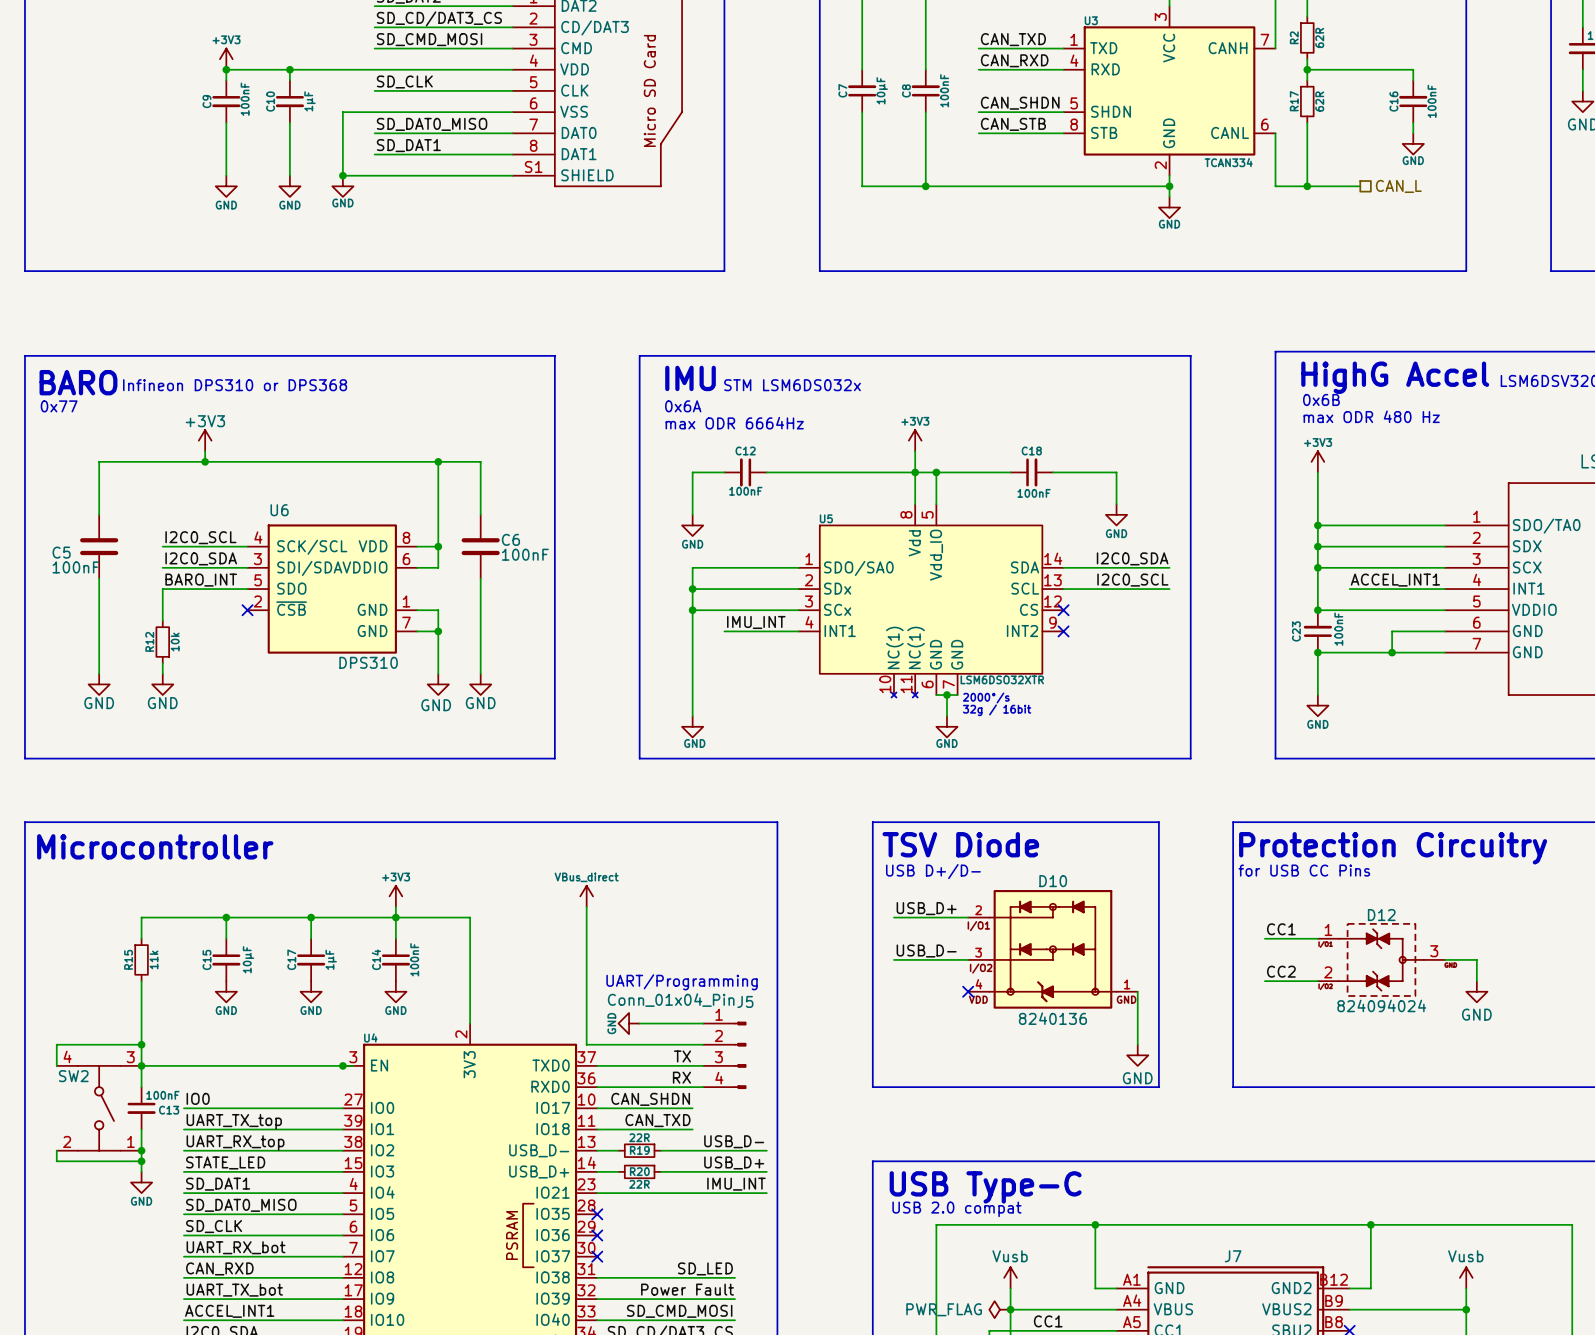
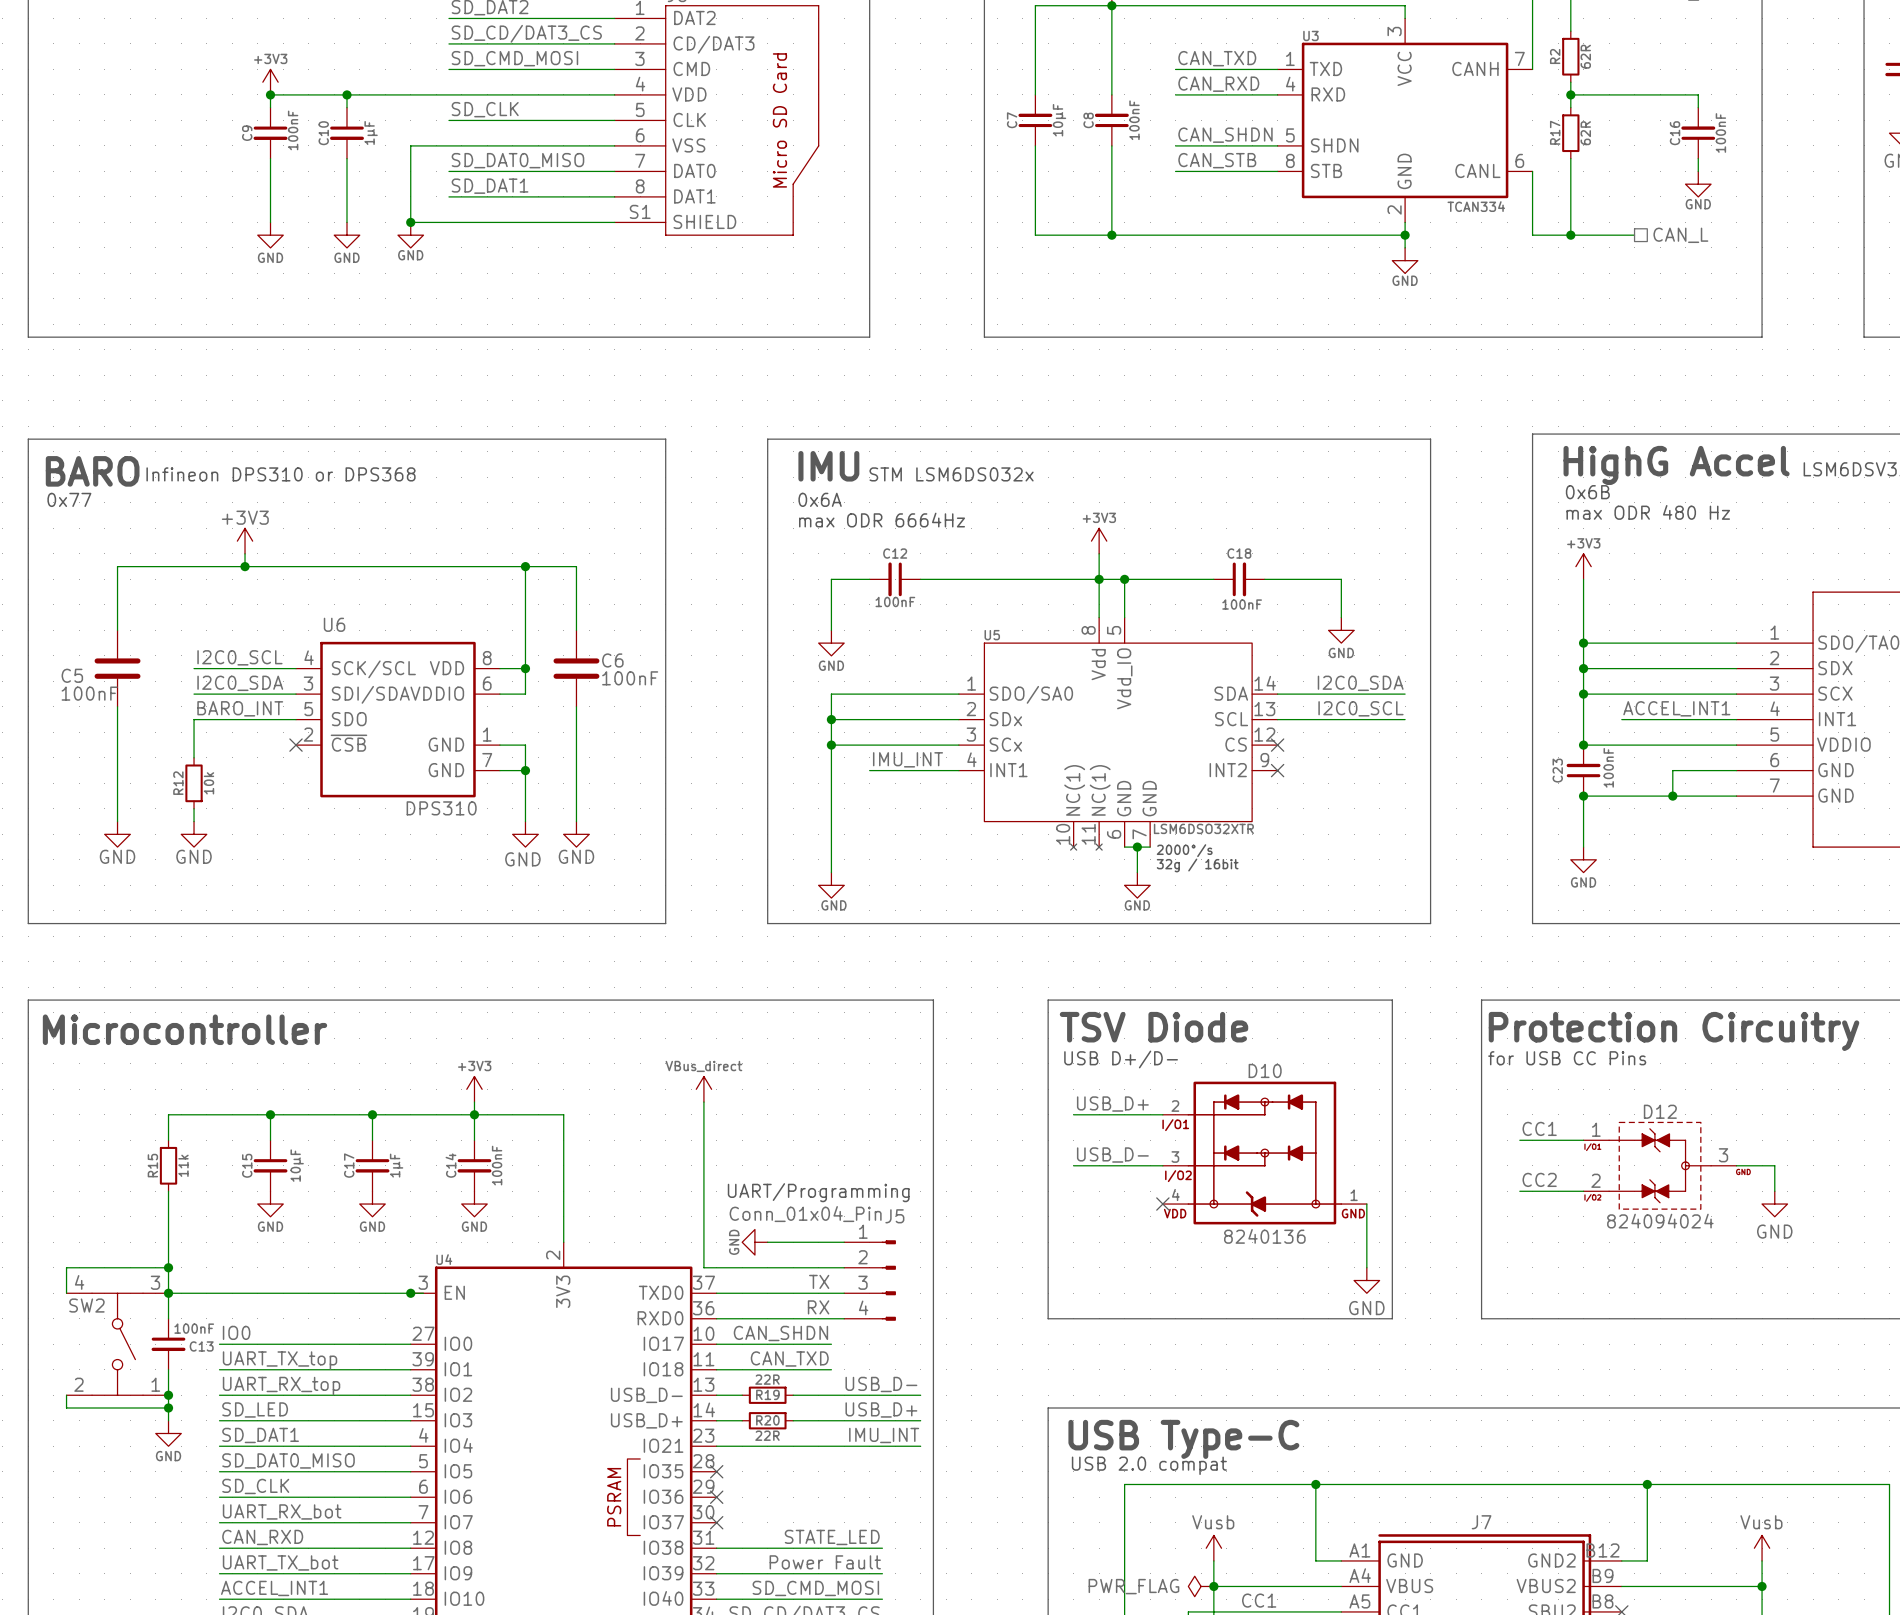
label: STATE_LED (225, 1162) -> SD_LED (255, 1409)
label: SD_LED (705, 1268) -> STATE_LED (832, 1537)

